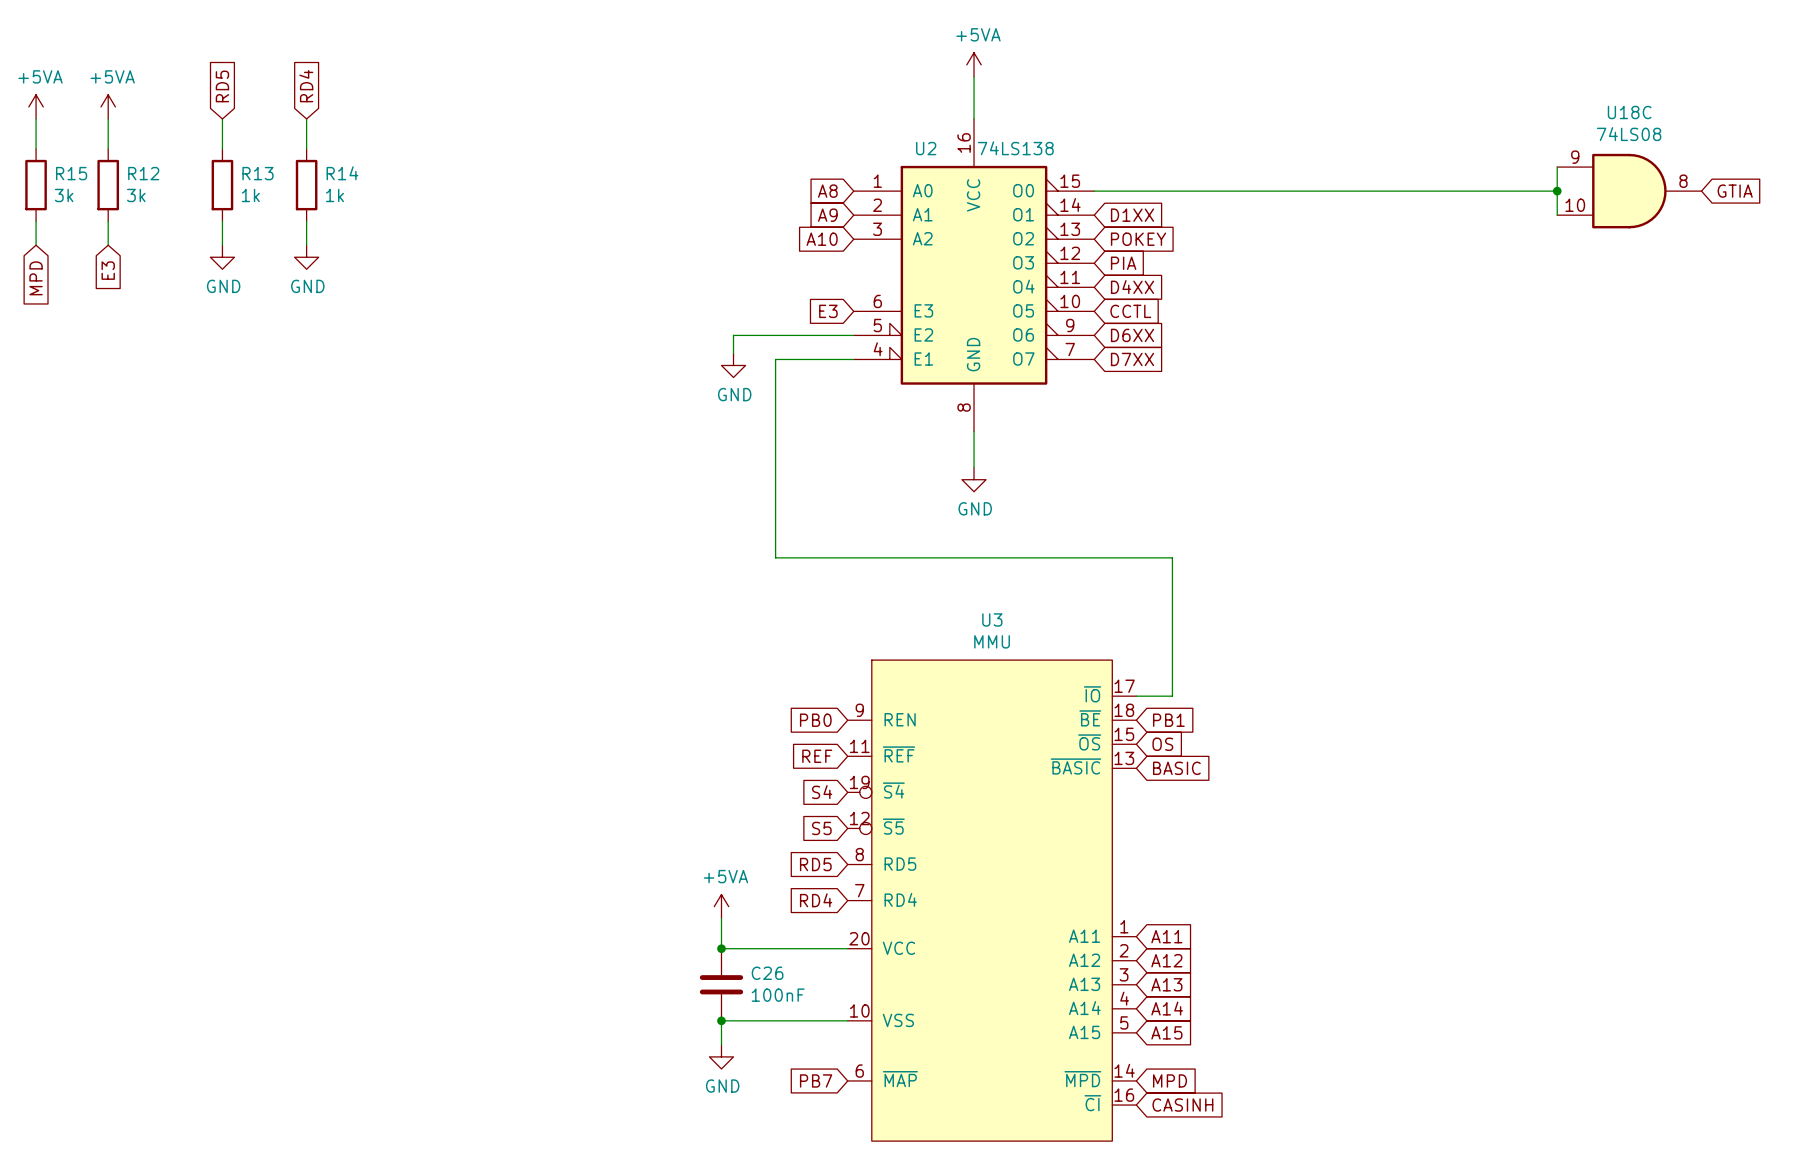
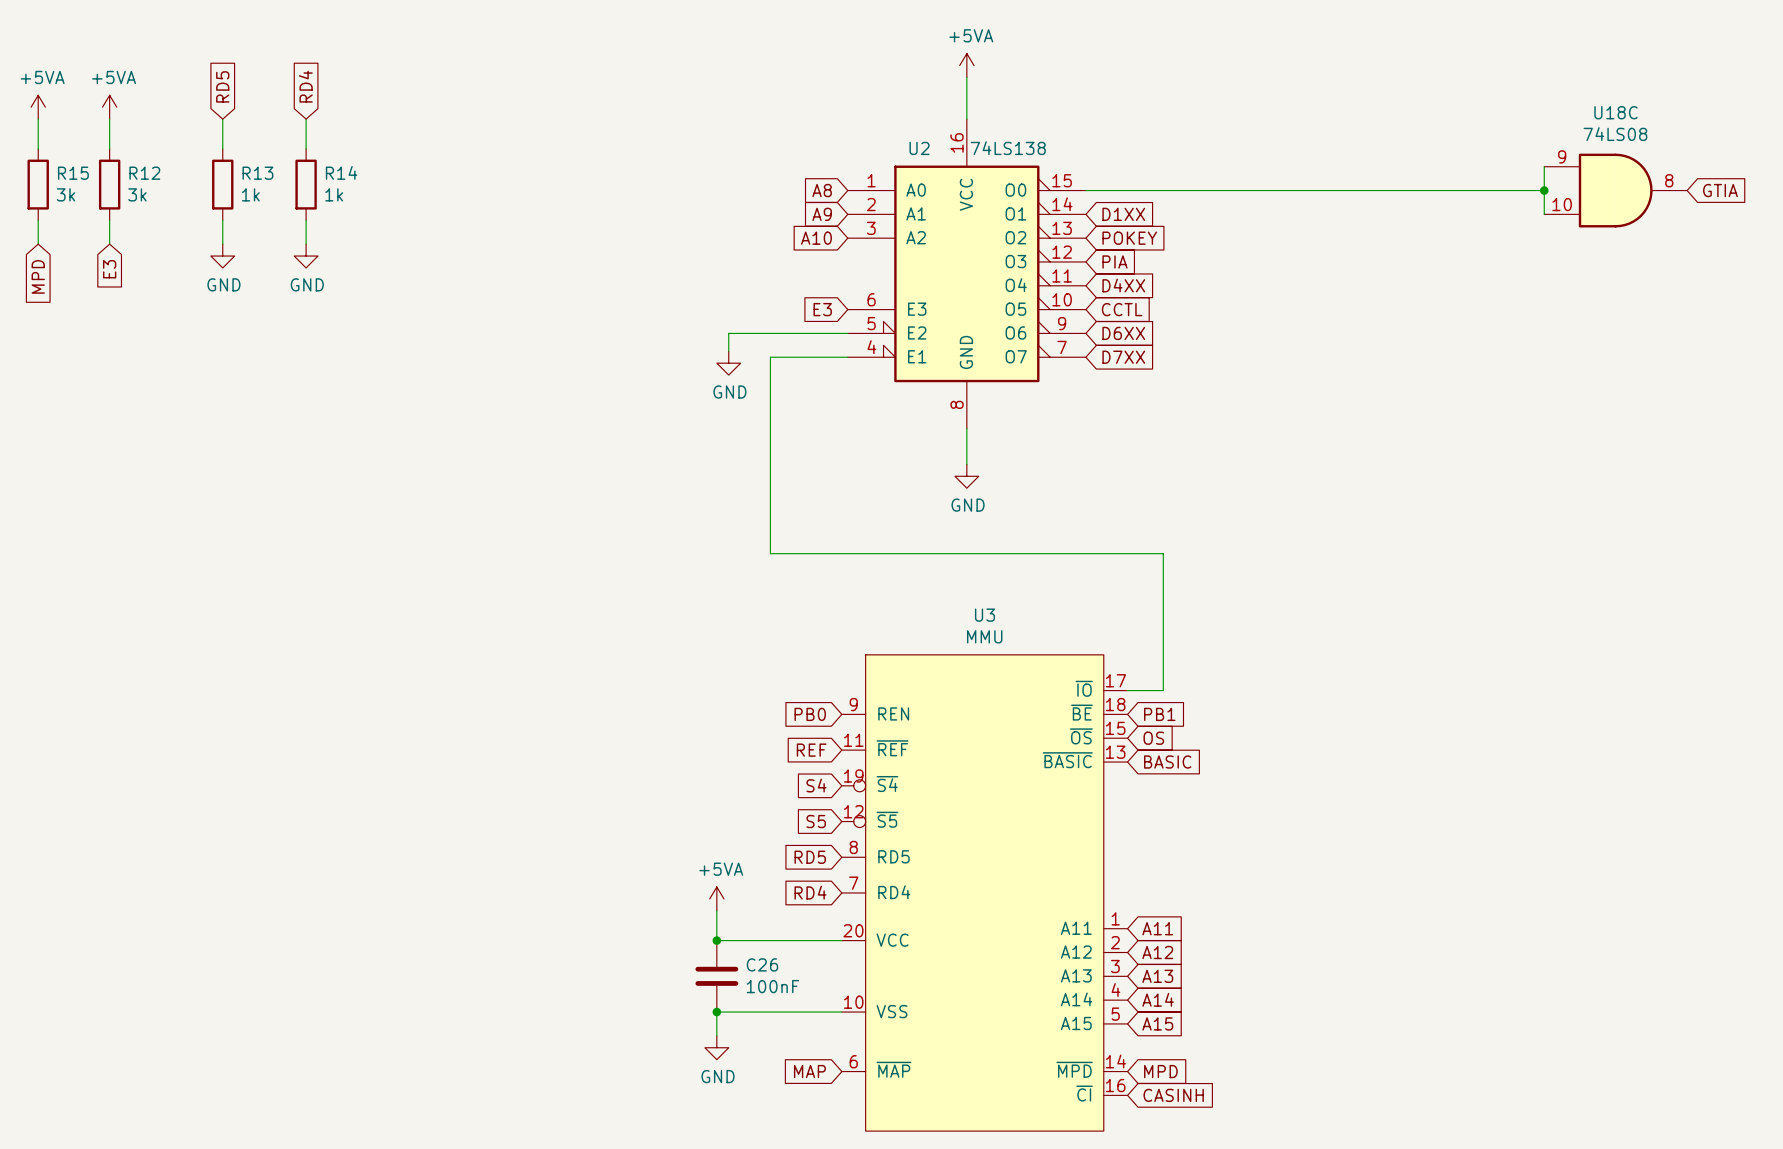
global label: PB7 (816, 1080) -> MAP (809, 1071)

